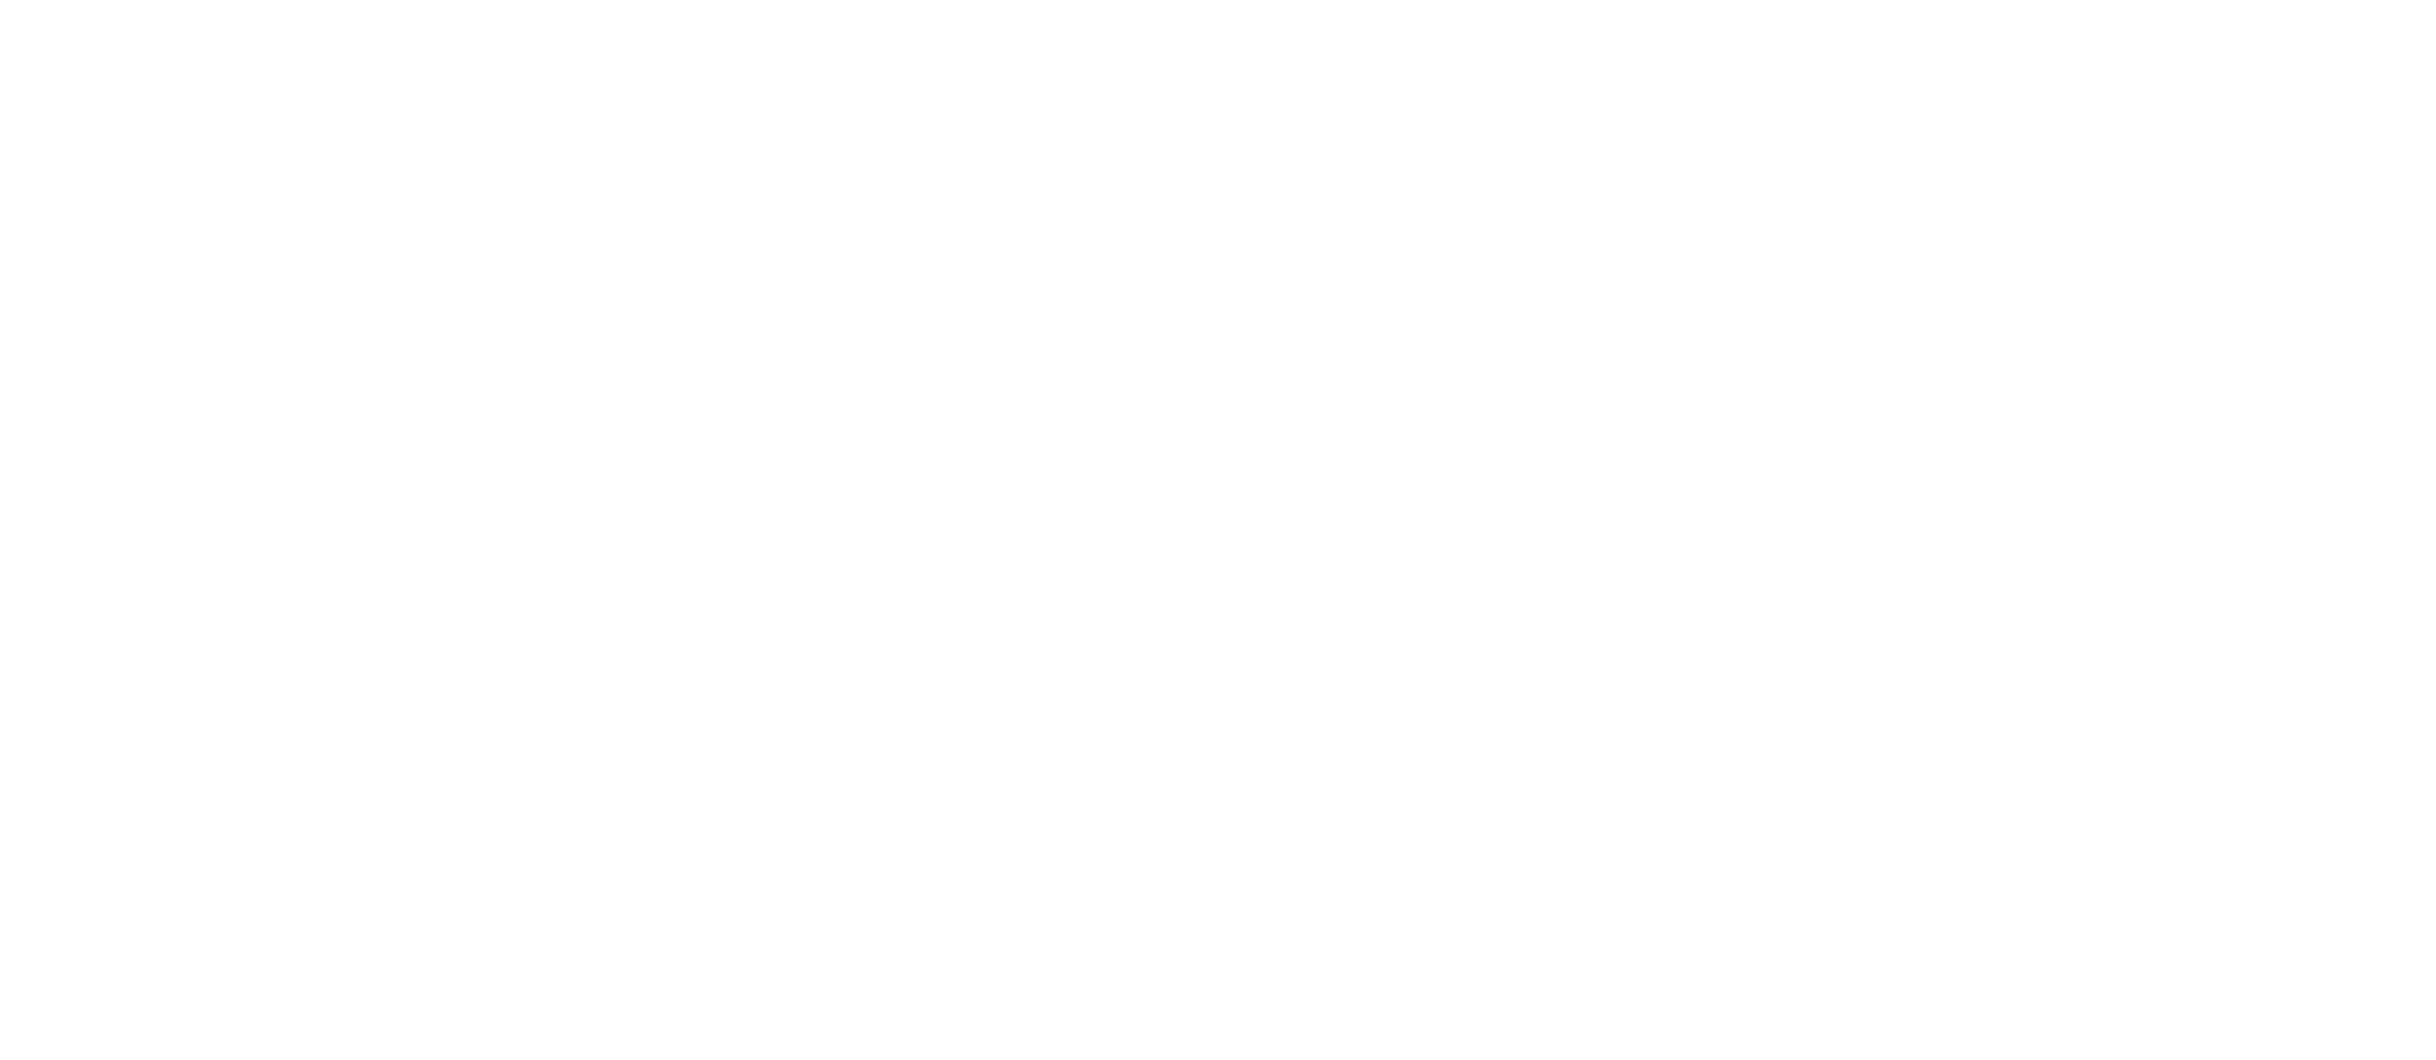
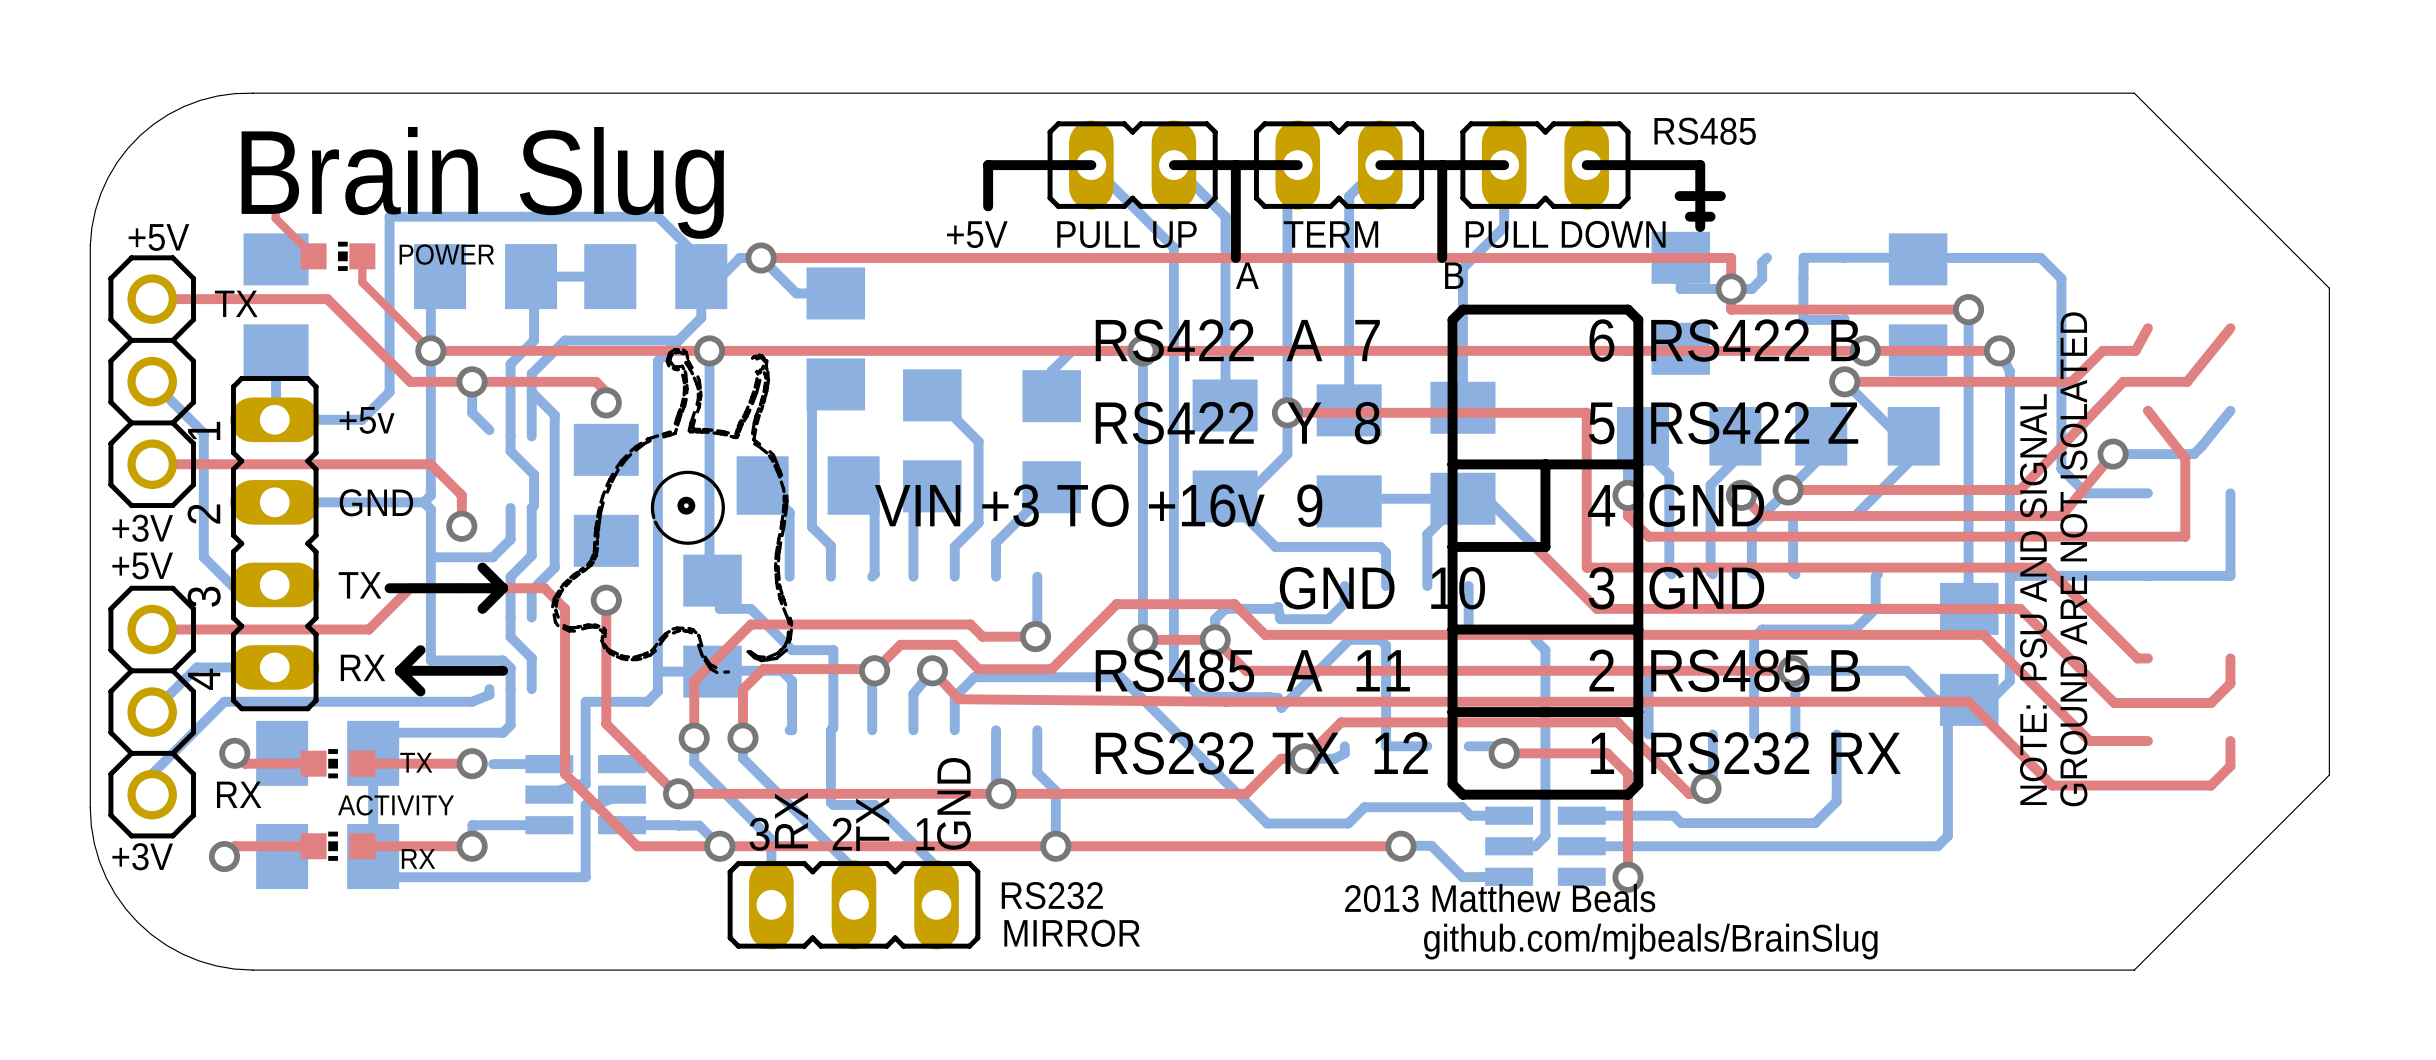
board edge: none -> (252, 93) (2134, 93) (2329, 288) (2329, 775) (2134, 970) (252, 970) (234, 969) (199, 960) (166, 945) (151, 934) (125, 908) (115, 894) (99, 861) (91, 825) (90, 245) (91, 227) (100, 193) (117, 162) (140, 135) (168, 114) (200, 100) (235, 93) (252, 93)
text: none -> RS485 (1705, 131)
line: none -> (1091, 165) (988, 165) (988, 206)
bottom track: none -> (1091, 165) (1173, 247) (1173, 670) (1199, 696) (1278, 697) (1281, 707) (1349, 639) (1380, 639) (1386, 645) (1386, 746) (1427, 746)
part: none -> (1132, 165)
line: none -> (1173, 165) (1297, 165)
bottom track: none -> (1173, 165) (1225, 216) (1225, 405)
line: none -> (1235, 165) (1235, 257)
bottom track: none -> (1297, 165) (1287, 175) (1287, 454) (1245, 496) (1225, 496) (1275, 546) (1380, 546) (1386, 552) (1386, 586)
part: none -> (1339, 165)
line: none -> (1380, 165) (1504, 165)
bottom track: none -> (1380, 165) (1349, 196) (1349, 410)
line: none -> (1442, 165) (1442, 257)
bottom track: none -> (1504, 165) (1504, 227) (1462, 268) (1462, 407)
part: none -> (1545, 165)
line: none -> (1586, 165) (1700, 165) (1700, 227)
text: none -> Brain Slug (482, 182)
line: none -> (1679, 196) (1720, 196)
top track: none -> (275, 210) (275, 218) (313, 256)
line: none -> (1689, 216) (1710, 216)
text: none -> +5V (977, 234)
text: none -> PULL UP (1127, 234)
text: none -> TERM (1330, 234)
text: none -> PULL DOWN (1565, 234)
text: none -> +5V (158, 237)
POWER: none -> (337, 256)
top track: none -> (362, 256) (362, 282) (430, 350) (1999, 350)
top track: none -> (761, 257) (1731, 257) (1731, 309) (1968, 309)
via: none -> (761, 257)
bottom track: none -> (1680, 257) (1680, 288) (1751, 288) (1762, 278) (1762, 262) (1767, 257)
text: none -> A (1247, 275)
text: none -> B (1454, 275)
bottom track: none -> (439, 276) (430, 285) (430, 495) (423, 502)
part: none -> (485, 276)
bottom track: none -> (610, 276) (531, 276) (534, 289) (534, 340) (510, 364) (510, 451) (534, 474) (531, 555) (510, 576) (510, 637) (531, 658) (531, 689)
part: none -> (655, 276)
bottom track: none -> (701, 276) (701, 317) (657, 361) (657, 691) (647, 701) (585, 701) (585, 784) (575, 784) (549, 794)
via: none -> (1731, 288)
bottom track: none -> (835, 293) (796, 293) (761, 257) (739, 257) (719, 278) (657, 216) (389, 216) (389, 392) (361, 419) (274, 419) (276, 350)
top track: none -> (152, 299) (327, 299) (410, 381) (595, 381) (606, 392) (606, 402)
text: none -> TX (236, 303)
part: none -> (1680, 303)
part: none -> (276, 304)
part: none -> (1918, 304)
line: none -> (1462, 309) (1628, 309) (1638, 319) (1638, 784) (1628, 794) (1462, 794) (1452, 784) (1452, 319) (1462, 309)
bottom track: none -> (1968, 309) (1968, 608)
via: none -> (1968, 309)
bottom track: none -> (1844, 318) (1803, 319) (1803, 257) (1916, 257) (1916, 278) (1916, 260) (1919, 257) (2040, 257) (2061, 278) (2061, 468) (2085, 493) (2147, 493)
top track: none -> (2147, 328) (2135, 350) (2102, 350) (2071, 381) (1844, 381)
top track: none -> (2230, 328) (2187, 381) (2123, 381) (2020, 489) (1788, 489)
part: none -> (835, 338)
bottom track: none -> (678, 340) (565, 340) (531, 373) (531, 436)
text: none -> RS422 A 7 (1237, 340)
text: none -> 6 RS422 B (1724, 340)
line: none -> (674, 349) (678, 349)
line: none -> (683, 349) (687, 358)
via: none -> (430, 350)
bottom track: none -> (709, 350) (709, 588)
via: none -> (709, 350)
via: none -> (1142, 350)
via: none -> (1865, 350)
bottom track: none -> (1999, 350) (2009, 371) (2009, 681) (1989, 701) (1968, 701)
via: none -> (1999, 350)
line: none -> (672, 351) (668, 354)
line: none -> (679, 352) (675, 352)
line: none -> (680, 352) (683, 353)
line: none -> (672, 353) (670, 358)
line: none -> (759, 355) (764, 358)
line: none -> (756, 356) (752, 358)
line: none -> (668, 357) (668, 365)
line: none -> (756, 358) (761, 357) (765, 361)
line: none -> (670, 360) (673, 365)
line: none -> (766, 360) (766, 364)
line: none -> (688, 361) (692, 367)
line: none -> (685, 362) (687, 365)
line: none -> (679, 366) (674, 366)
line: none -> (682, 366) (683, 368)
line: none -> (763, 366) (762, 368)
line: none -> (766, 366) (766, 369)
line: none -> (688, 367) (692, 373)
line: none -> (673, 368) (678, 369)
line: none -> (760, 369) (760, 372)
line: none -> (685, 371) (686, 381)
line: none -> (756, 371) (757, 374)
line: none -> (767, 371) (767, 384)
line: none -> (764, 372) (765, 378)
line: none -> (682, 375) (684, 382)
line: none -> (697, 376) (700, 388)
line: none -> (694, 378) (698, 389)
line: none -> (757, 378) (755, 387)
line: none -> (759, 380) (752, 403)
bottom track: none -> (152, 381) (203, 433) (203, 557) (234, 588) (271, 588) (274, 584)
part: none -> (152, 381)
bottom track: none -> (472, 381) (472, 412) (489, 430)
via: none -> (472, 381)
bottom track: none -> (1844, 381) (1899, 436) (1913, 436) (1913, 457) (1855, 516) (1793, 516) (1793, 572) (1795, 574)
via: none -> (1844, 381)
line: none -> (765, 383) (764, 391)
bottom track: none -> (835, 384) (811, 408) (811, 526) (830, 545) (830, 576)
line: none -> (686, 385) (686, 392)
line: none -> (684, 386) (684, 394)
line: none -> (767, 387) (765, 395)
line: none -> (700, 391) (700, 399)
line: none -> (753, 391) (750, 402)
bottom track: none -> (531, 392) (554, 415) (554, 567) (531, 590) (531, 617)
line: none -> (698, 394) (697, 404)
bottom track: none -> (932, 395) (978, 441) (978, 522) (954, 546) (954, 576)
line: none -> (762, 396) (760, 404)
bottom track: none -> (1051, 396) (1051, 371) (1072, 350) (1142, 350) (1142, 639)
line: none -> (764, 398) (763, 402)
line: none -> (683, 399) (681, 406)
line: none -> (686, 399) (682, 411)
via: none -> (606, 402)
line: none -> (699, 403) (697, 411)
line: none -> (762, 406) (760, 411)
line: none -> (747, 407) (743, 417)
line: none -> (758, 408) (752, 433)
line: none -> (680, 409) (675, 423)
line: none -> (749, 410) (744, 421)
top track: none -> (2147, 410) (2185, 458) (2185, 536) (1648, 536) (1628, 516) (1628, 495)
bottom track: none -> (2230, 410) (2193, 454) (2113, 454)
line: none -> (694, 412) (689, 430)
top track: none -> (1287, 412) (1586, 412) (1586, 567) (2046, 567) (2137, 658) (2147, 658)
via: none -> (1287, 412)
line: none -> (681, 414) (677, 424)
line: none -> (759, 415) (756, 423)
text: none -> +5v (367, 420)
line: none -> (694, 420) (692, 428)
line: none -> (741, 420) (738, 426)
line: none -> (742, 423) (739, 431)
text: none -> RS422 Y 8 (1237, 423)
text: none -> 5 RS422 Z (1723, 423)
line: none -> (676, 429) (675, 433) (663, 436)
line: none -> (693, 429) (699, 429)
line: none -> (703, 429) (711, 430)
line: none -> (737, 429) (735, 434)
line: none -> (755, 429) (753, 439)
line: none -> (717, 430) (728, 432)
line: none -> (690, 431) (693, 431)
line: none -> (696, 431) (708, 432)
line: none -> (670, 432) (663, 434)
line: none -> (714, 433) (726, 434)
line: none -> (738, 434) (737, 437)
line: none -> (657, 435) (646, 439)
line: none -> (731, 436) (736, 437)
part: none -> (1689, 436)
bottom track: none -> (1821, 436) (1821, 456) (1751, 526) (1751, 572) (1754, 574)
part: none -> (1867, 436)
line: none -> (650, 440) (636, 450)
line: none -> (754, 440) (759, 444)
part: none -> (932, 440)
part: none -> (1051, 441)
line: none -> (641, 443) (630, 450)
line: none -> (754, 443) (766, 452)
part: none -> (1225, 450)
line: none -> (770, 451) (778, 466)
part: none -> (1462, 453)
line: none -> (630, 454) (621, 465)
top track: none -> (2113, 454) (2061, 516) (1762, 516) (1741, 495)
via: none -> (2113, 454)
line: none -> (626, 455) (616, 467)
line: none -> (769, 455) (772, 461)
part: none -> (1349, 455)
bottom track: none -> (1735, 460) (1710, 485) (1710, 572) (1712, 574)
top track: none -> (152, 464) (430, 464) (461, 495) (461, 526)
line: none -> (1452, 464) (1638, 464)
line: none -> (1545, 464) (1545, 546) (1452, 546)
line: none -> (774, 465) (779, 477)
line: none -> (779, 468) (781, 475)
line: none -> (618, 469) (611, 481)
bottom track: none -> (874, 473) (853, 485) (874, 506) (874, 574) (872, 576)
line: none -> (612, 474) (606, 485)
line: none -> (781, 482) (784, 491)
line: none -> (610, 485) (607, 492)
bottom track: none -> (762, 485) (789, 512) (789, 576)
part: none -> (808, 485)
bottom track: none -> (932, 486) (913, 505) (913, 576)
bottom track: none -> (1051, 487) (996, 542) (996, 576)
via: none -> (1788, 489)
line: none -> (604, 491) (600, 502)
bottom track: none -> (2230, 493) (2230, 575) (2013, 575) (2009, 579)
part: none -> (606, 495)
line: none -> (786, 495) (785, 515)
bottom track: none -> (1628, 495) (1628, 451) (1642, 436) (1642, 448) (1669, 474) (1669, 572) (1671, 574)
via: none -> (1628, 495)
via: none -> (1741, 495)
drawing: none -> [677, 496, 696, 515]
line: none -> (784, 496) (784, 501)
bottom track: none -> (1462, 498) (1427, 534) (1427, 586)
bottom track: none -> (1349, 501) (1351, 498) (1486, 498) (1535, 546)
bottom track: none -> (274, 502) (423, 502)
text: none -> GND (376, 502)
bottom track: none -> (423, 502) (430, 509) (430, 660) (503, 660) (510, 667) (510, 725) (503, 732) (389, 732) (373, 749) (373, 856) (393, 877) (585, 877) (585, 804) (595, 804) (621, 794)
line: none -> (603, 502) (598, 526)
line: none -> (783, 504) (783, 512)
text: none -> VIN +3 TO +16v 9 (1098, 505)
text: none -> 4 GND (1676, 505)
bottom track: none -> (510, 507) (510, 539) (492, 557) (430, 557)
line: none -> (599, 507) (597, 516)
line: none -> (782, 516) (780, 528)
line: none -> (653, 517) (652, 504) (656, 491) (665, 480) (676, 474) (690, 472) (703, 475) (714, 484) (721, 495) (723, 509) (720, 522) (712, 533) (701, 540) (687, 543) (674, 540) (663, 533) (655, 522)
line: none -> (596, 521) (595, 535)
line: none -> (784, 521) (782, 535)
via: none -> (461, 526)
line: none -> (598, 527) (598, 530)
text: none -> +3V (142, 528)
line: none -> (598, 533) (597, 538)
line: none -> (779, 534) (778, 543)
line: none -> (597, 540) (597, 544)
line: none -> (594, 542) (594, 545)
line: none -> (780, 542) (779, 553)
part: none -> (274, 543)
line: none -> (777, 546) (775, 558)
top track: none -> (1535, 546) (1597, 608) (2020, 608) (2114, 702) (2211, 702) (2230, 683) (2230, 658)
line: none -> (594, 547) (594, 552)
line: none -> (597, 548) (594, 559)
line: none -> (593, 554) (591, 559)
line: none -> (778, 556) (778, 560)
text: none -> GROUND ARE NOT ISOLATED (2073, 559)
line: none -> (589, 561) (587, 565)
line: none -> (593, 562) (587, 567)
line: none -> (775, 563) (775, 570)
text: none -> +5V (142, 565)
line: none -> (778, 566) (779, 579)
line: none -> (482, 567) (503, 588)
line: none -> (583, 568) (579, 570)
line: none -> (586, 569) (582, 571)
line: none -> (577, 572) (570, 577)
line: none -> (579, 574) (573, 578)
line: none -> (776, 574) (777, 588)
bottom track: none -> (1877, 574) (1875, 576) (1875, 608)
bottom track: none -> (1037, 576) (1037, 634) (1035, 636)
line: none -> (567, 580) (561, 587)
line: none -> (570, 580) (566, 585)
bottom track: none -> (712, 580) (719, 587) (719, 608) (750, 608) (792, 650) (833, 650) (830, 802) (833, 804) (874, 804) (936, 866) (936, 904)
line: none -> (779, 584) (782, 593)
text: none -> TX (360, 585)
bottom track: none -> (1344, 586) (1344, 603) (1328, 619) (1280, 619) (1278, 606) (1275, 608) (1225, 608) (1215, 619) (1215, 639)
bottom track: none -> (1468, 586) (1468, 634)
line: none -> (389, 588) (503, 588)
line: none -> (503, 588) (482, 608)
text: none -> GND 10 (1382, 588)
text: none -> 3 GND (1676, 588)
line: none -> (562, 589) (558, 597)
line: none -> (559, 590) (552, 606)
line: none -> (779, 594) (781, 603)
line: none -> (782, 596) (785, 604)
text: none -> NOTE: PSU AND SIGNAL (2033, 599)
line: none -> (557, 600) (556, 606)
top track: none -> (606, 600) (606, 724) (676, 793) (1246, 793) (1281, 758) (1304, 758) (1341, 722) (1617, 722) (1689, 793) (1700, 793) (1706, 788)
via: none -> (606, 600)
line: none -> (783, 608) (789, 623)
bottom track: none -> (1875, 608) (1855, 629) (1762, 629) (1754, 637) (1754, 734)
line: none -> (555, 610) (558, 617)
line: none -> (554, 614) (557, 625)
line: none -> (790, 618) (791, 625)
line: none -> (590, 624) (584, 625)
line: none -> (593, 624) (598, 626)
line: none -> (564, 625) (574, 627)
line: none -> (580, 626) (576, 627)
part: none -> (712, 626)
line: none -> (597, 627) (582, 628)
line: none -> (563, 628) (574, 631)
line: none -> (603, 628) (605, 636)
line: none -> (683, 628) (673, 629)
line: none -> (688, 628) (695, 632)
top track: none -> (152, 629) (368, 629) (410, 588) (544, 588) (565, 608) (565, 774) (637, 846) (1400, 846)
line: none -> (600, 629) (602, 631)
line: none -> (1452, 629) (1638, 629)
line: none -> (679, 630) (673, 632)
line: none -> (683, 630) (691, 632)
line: none -> (791, 630) (789, 642)
line: none -> (669, 631) (659, 639)
line: none -> (788, 632) (784, 646) (777, 653) (767, 657)
line: none -> (666, 635) (660, 644)
line: none -> (698, 635) (701, 645)
line: none -> (602, 636) (604, 647)
top track: none -> (1035, 636) (982, 636) (970, 624) (751, 624) (694, 681) (694, 738)
via: none -> (1035, 636)
top track: none -> (1142, 639) (1215, 639) (1246, 670) (1793, 670)
via: none -> (1142, 639)
via: none -> (1215, 639)
bottom track: none -> (1535, 639) (1545, 650) (1545, 835) (1535, 846) (1509, 846)
line: none -> (604, 644) (608, 649) (617, 653)
line: none -> (656, 644) (651, 650)
line: none -> (698, 645) (702, 656)
line: none -> (420, 650) (399, 670)
line: none -> (607, 650) (613, 655)
line: none -> (655, 650) (644, 657)
line: none -> (786, 650) (776, 658) (761, 660) (754, 657) (748, 651)
line: none -> (750, 651) (757, 656) (764, 657)
line: none -> (647, 652) (643, 654)
part: none -> (1969, 654)
line: none -> (621, 655) (628, 656)
line: none -> (641, 655) (633, 657)
line: none -> (617, 656) (627, 659)
line: none -> (705, 657) (709, 664) (715, 667)
line: none -> (640, 658) (632, 659)
line: none -> (705, 660) (710, 668) (716, 672)
bottom track: none -> (274, 667) (196, 667) (152, 712)
text: none -> RX (363, 667)
line: none -> (399, 670) (503, 670)
line: none -> (399, 670) (420, 691)
bottom track: none -> (874, 670) (872, 673) (872, 730)
top track: none -> (874, 670) (872, 669) (763, 669) (742, 689) (742, 738)
top track: none -> (874, 670) (900, 644) (954, 644) (978, 669) (1051, 669) (1116, 604) (1234, 604) (1265, 634) (1983, 634) (2089, 741) (2147, 741)
via: none -> (874, 670)
bottom track: none -> (932, 670) (913, 693) (913, 730)
top track: none -> (932, 670) (958, 699) (1225, 701) (1968, 701) (2052, 785) (2211, 785) (2230, 766) (2230, 741)
via: none -> (932, 670)
text: none -> RS485 A 11 (1252, 670)
bottom track: none -> (1648, 670) (1648, 734)
text: none -> 2 RS485 B (1724, 670)
via: none -> (1793, 670)
bottom track: none -> (657, 671) (781, 670) (792, 681) (792, 730) (789, 730)
line: none -> (728, 671) (724, 672)
bottom track: none -> (489, 689) (489, 694) (472, 701) (224, 701) (152, 774) (152, 794)
bottom track: none -> (1947, 699) (1947, 835) (1937, 846) (1581, 846)
bottom track: none -> (1969, 699) (1935, 699) (1906, 670) (1793, 670) (1795, 673) (1795, 734)
part: none -> (152, 712)
line: none -> (1452, 712) (1638, 712)
bottom track: none -> (954, 730) (954, 697) (974, 677) (1120, 677) (1267, 823) (1348, 823) (1364, 807) (1462, 807) (1470, 815) (1509, 815)
bottom track: none -> (996, 730) (996, 788) (1001, 793)
bottom track: none -> (1037, 730) (1037, 772) (1055, 790) (1055, 846)
bottom track: none -> (1712, 734) (1712, 781) (1706, 788)
bottom track: none -> (1836, 734) (1836, 801) (1815, 823) (1681, 823) (1673, 815) (1581, 815)
bottom track: none -> (694, 738) (694, 762) (771, 839) (771, 904)
via: none -> (694, 738)
bottom track: none -> (742, 738) (742, 758) (853, 869) (853, 904)
via: none -> (742, 738)
bottom track: none -> (1344, 746) (1344, 753) (1334, 758) (1304, 758)
bottom track: none -> (1468, 746) (1497, 746) (1504, 753)
top track: none -> (234, 753) (245, 763) (313, 763)
via: none -> (234, 753)
part: none -> (327, 753)
text: none -> RS232 TX 12 (1261, 753)
top track: none -> (1504, 753) (1607, 753) (1628, 774) (1628, 877)
via: none -> (1504, 753)
text: none -> 1 RS232 RX (1745, 753)
via: none -> (1304, 758)
TX: none -> (337, 763)
top track: none -> (362, 763) (472, 763)
via: none -> (472, 763)
bottom track: none -> (493, 764) (549, 764)
via: none -> (1706, 788)
via: none -> (678, 793)
via: none -> (1001, 793)
text: none -> RX (239, 794)
part: none -> (585, 794)
text: none -> GND (953, 803)
text: none -> ACTIVITY (396, 805)
text: none -> RX (791, 820)
text: none -> TX (872, 824)
bottom track: none -> (549, 825) (472, 825) (472, 846)
bottom track: none -> (621, 825) (678, 825)
bottom track: none -> (678, 825) (699, 825) (719, 846)
bottom track: none -> (1401, 845) (1431, 845) (1462, 877) (1509, 876)
top track: none -> (313, 846) (234, 846) (224, 856)
RX: none -> (337, 846)
top track: none -> (362, 846) (472, 846)
via: none -> (472, 846)
via: none -> (719, 846)
via: none -> (1055, 846)
via: none -> (1400, 846)
part: none -> (1545, 846)
text: none -> +3V (142, 856)
via: none -> (224, 856)
part: none -> (327, 856)
via: none -> (1628, 877)
text: none -> RS232 (1052, 895)
text: none -> 2013 Matthew Beals (1500, 898)
part: none -> (853, 904)
text: none -> MIRROR (1072, 933)
text: none -> github.com/mjbeals/BrainSlug (1650, 941)

